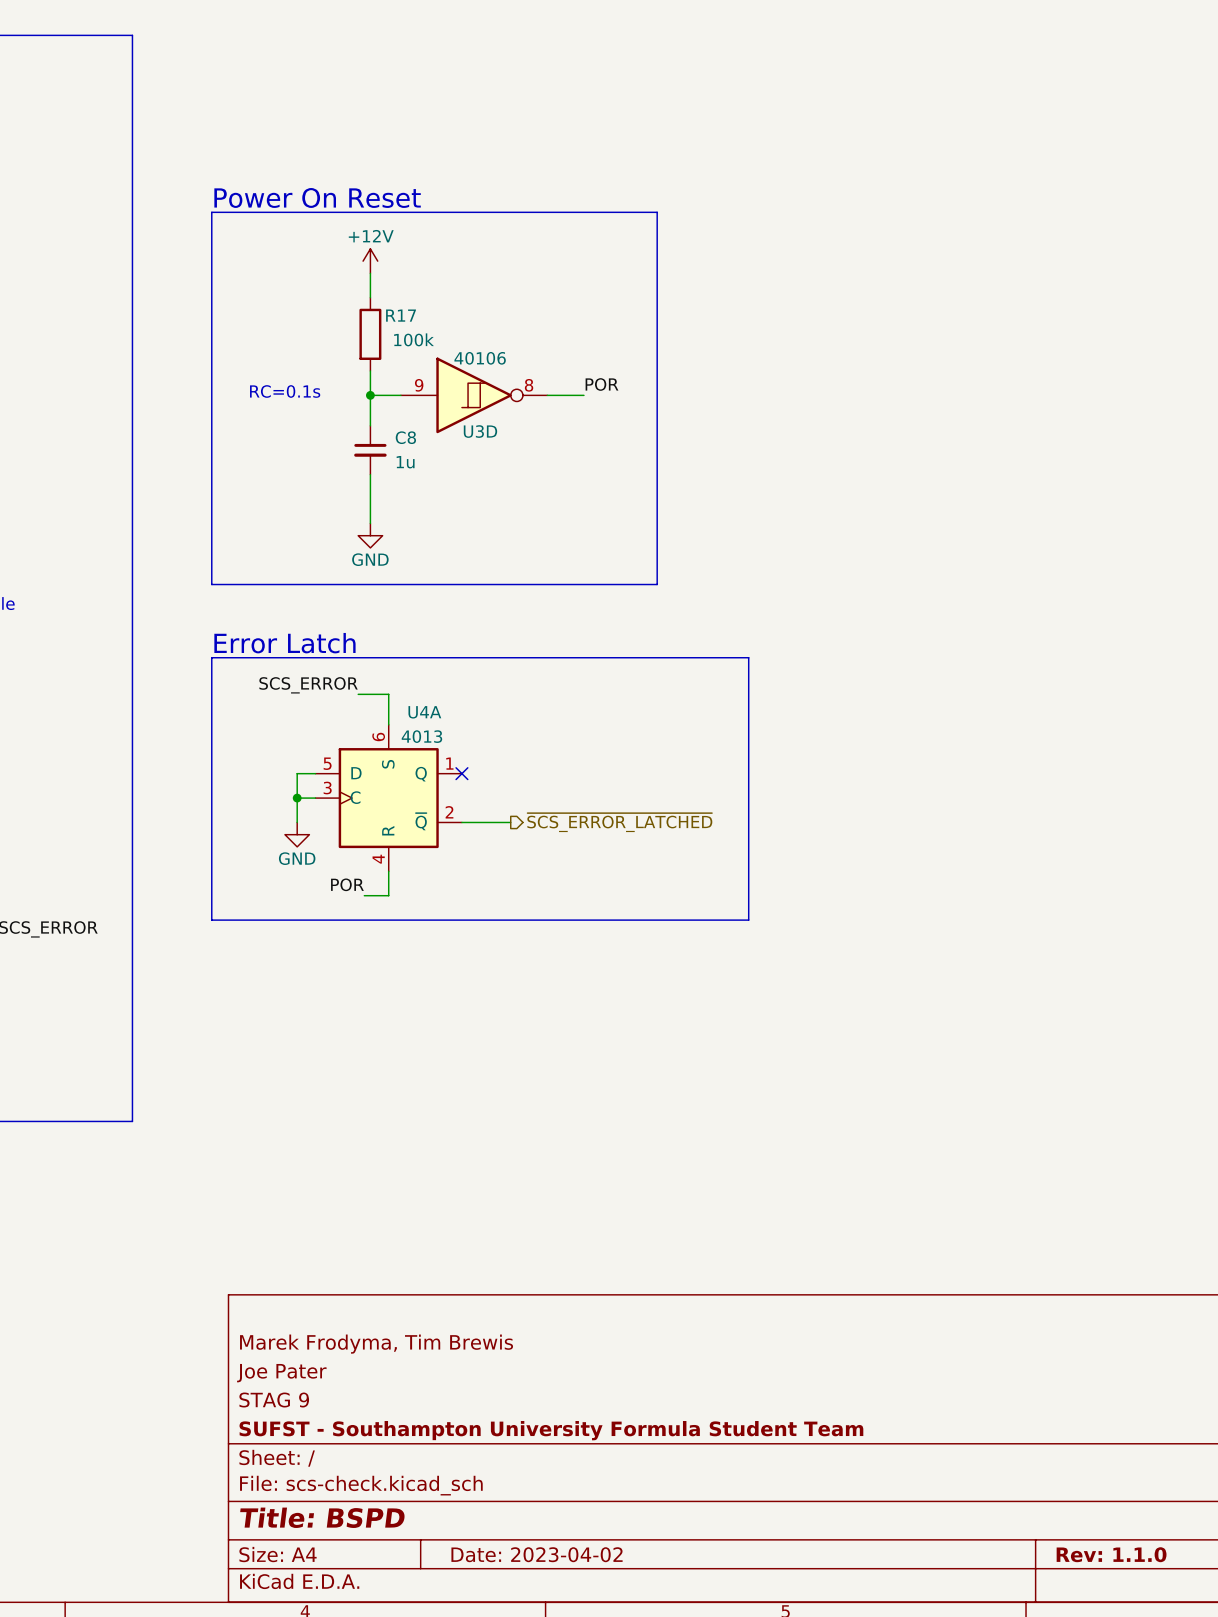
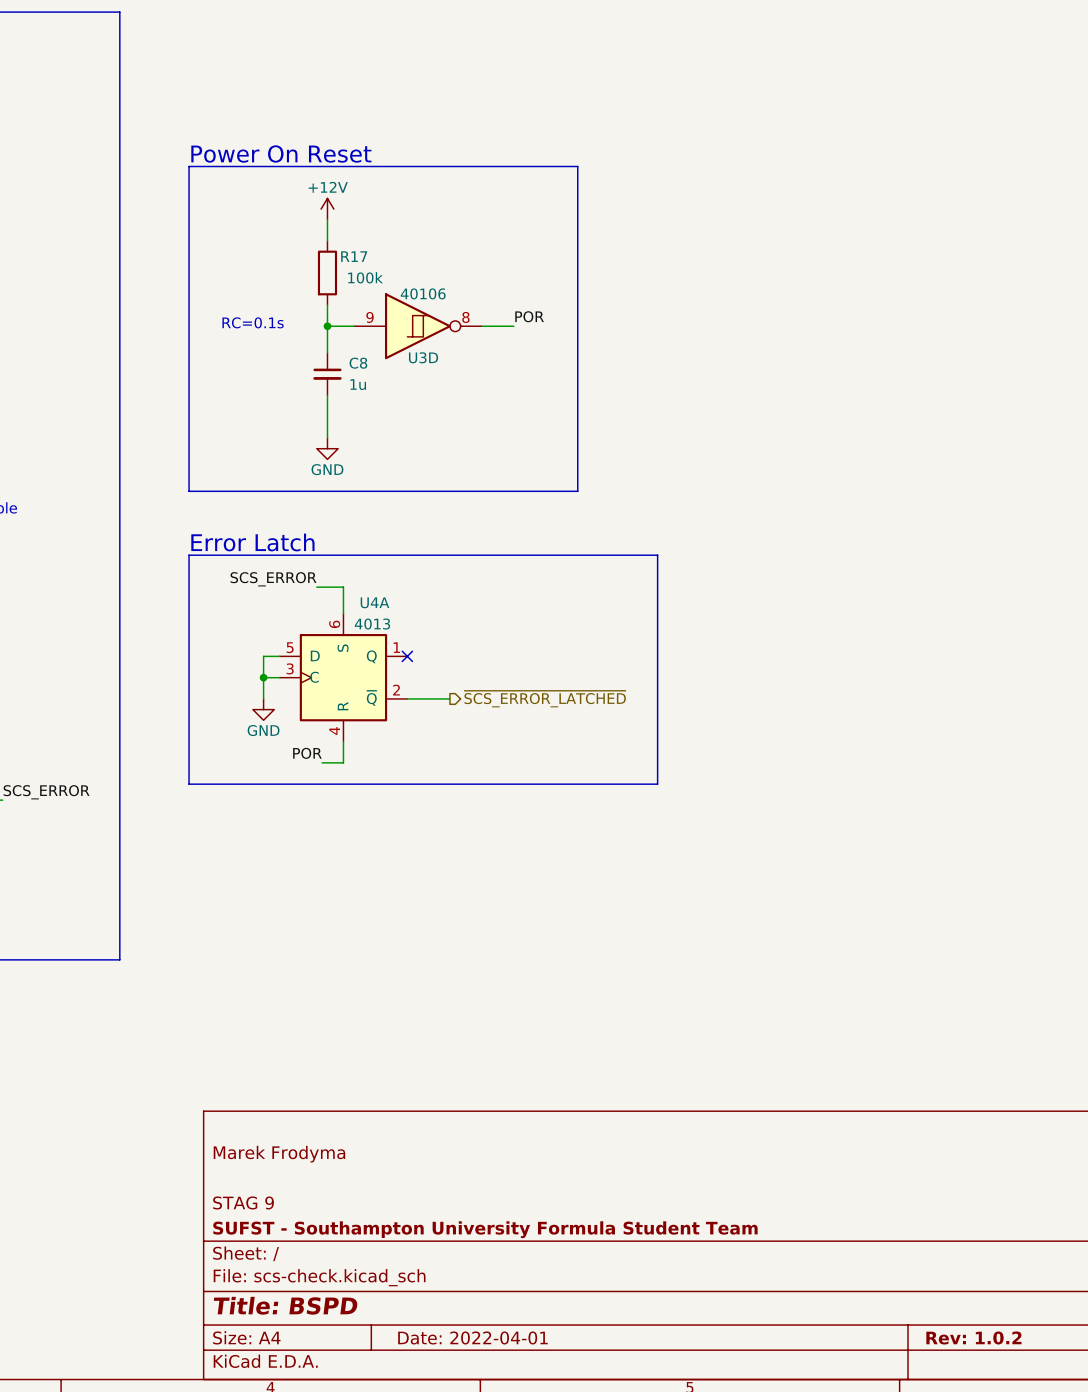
title block: Marek Frodyma, Tim Brewis (376, 1344) -> Marek Frodyma (279, 1154)
title block: Joe Pater (281, 1373) -> none
title block: Date: 2023-04-02 (537, 1554) -> Date: 2022-04-01 (472, 1337)
title block: Rev: 1.1.0 (1111, 1554) -> Rev: 1.0.2 (973, 1337)

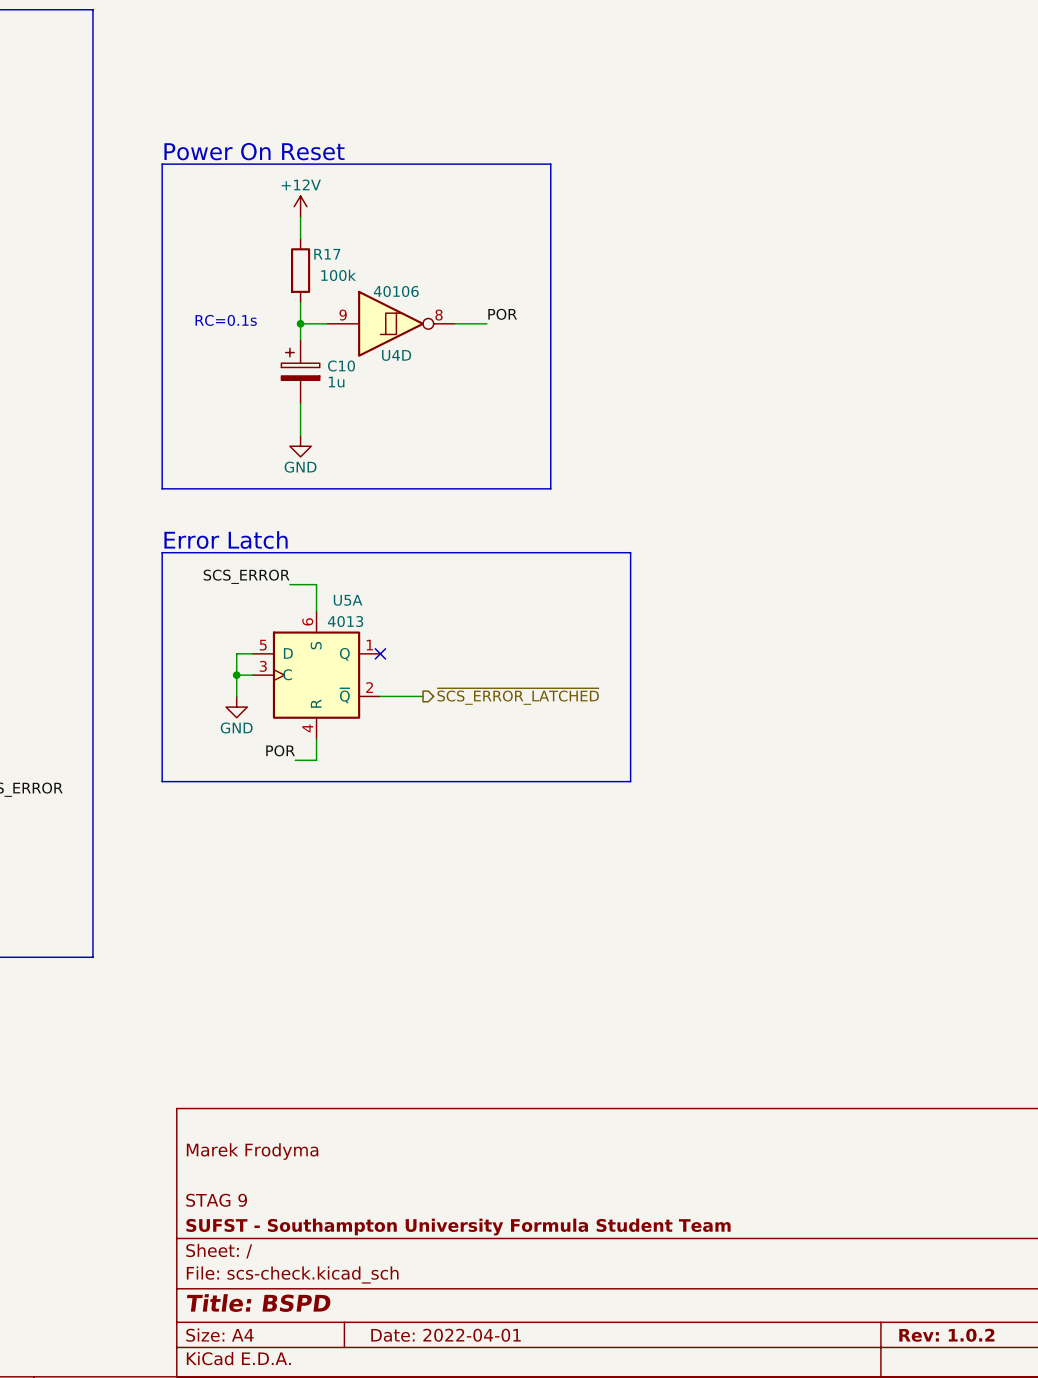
U3D name: U3D (423, 357) -> U4D (396, 355)
C8: 1u (327, 374) -> none
C10: none -> 1u (300, 371)
U4A name: U4A (374, 602) -> U5A (348, 600)

